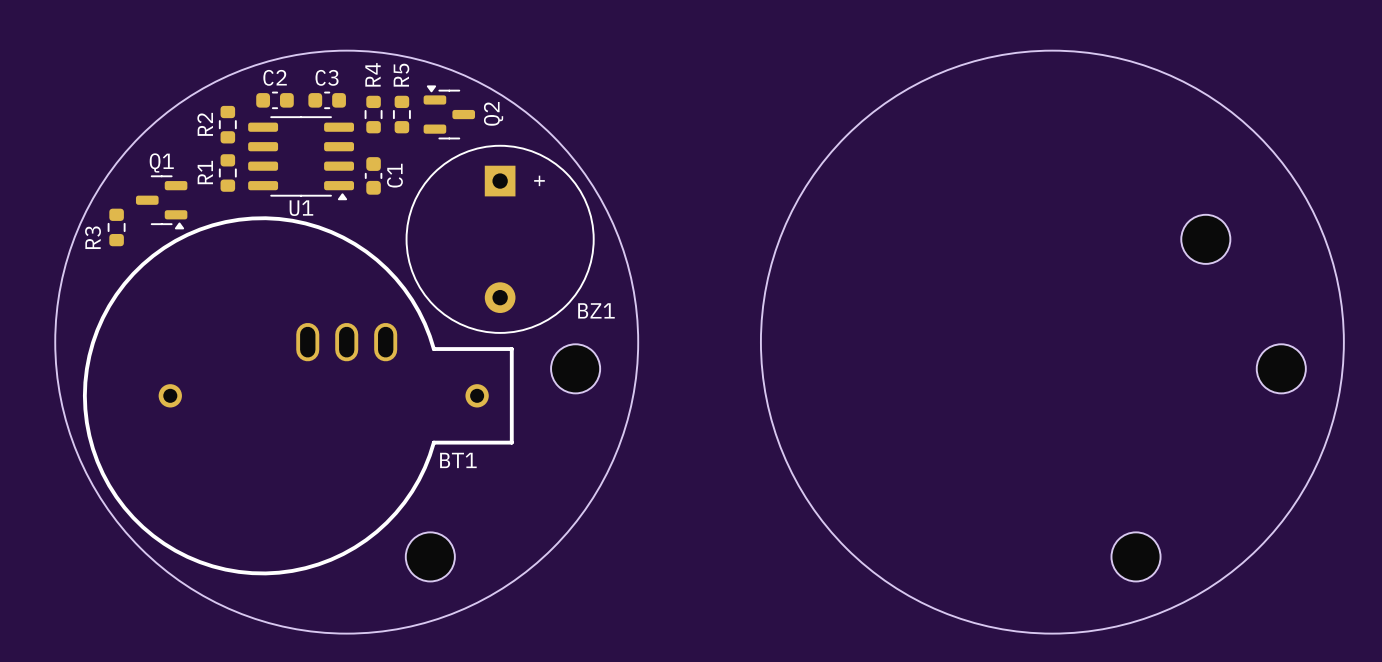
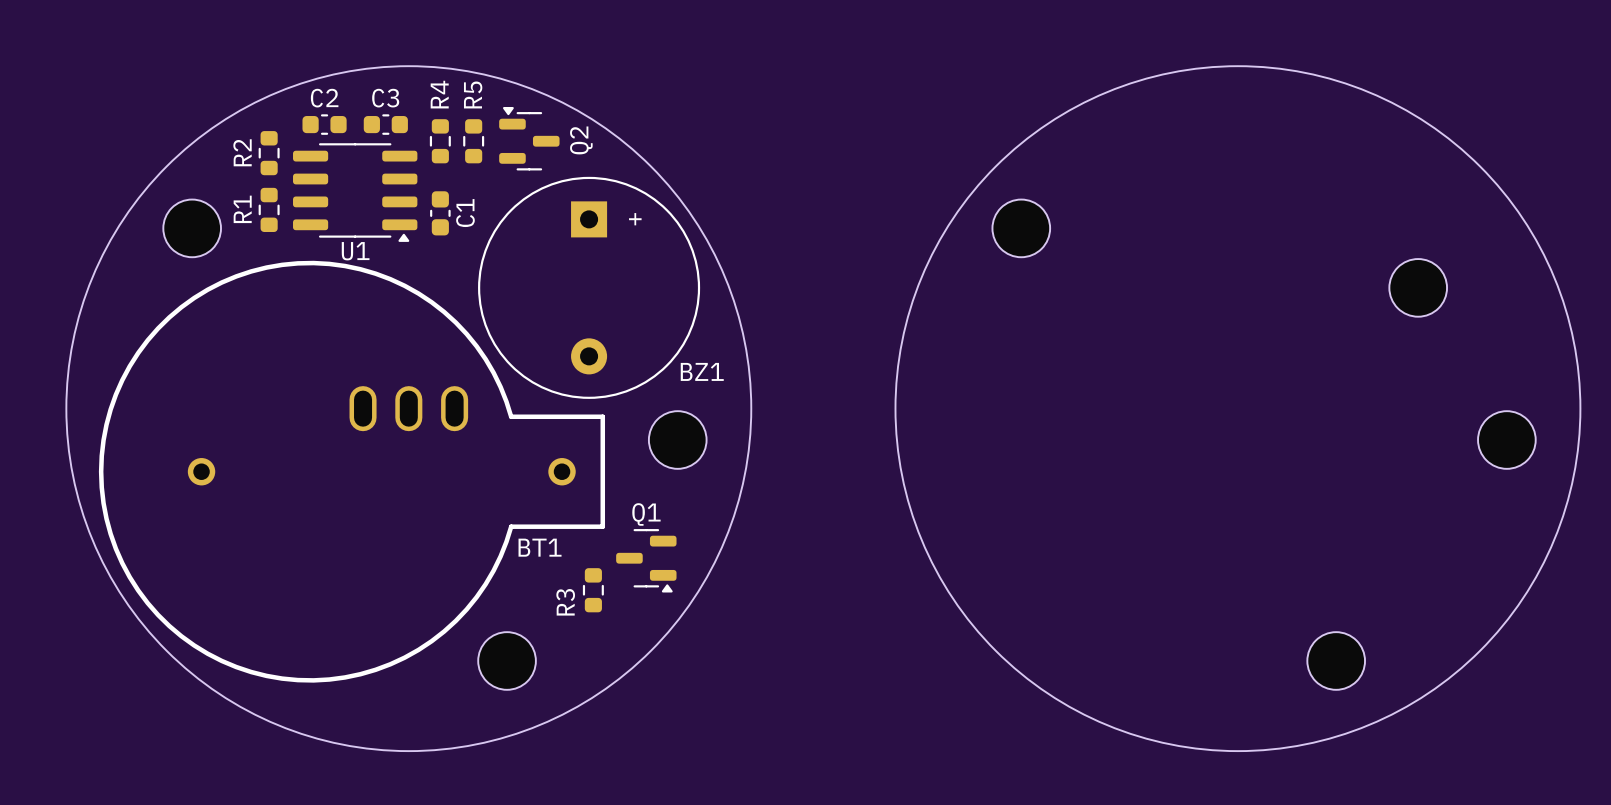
part: none -> (192, 228)
part: none -> (1021, 228)
Q1 position: (161, 202) -> (646, 560)
R3 position: (116, 227) -> (593, 590)

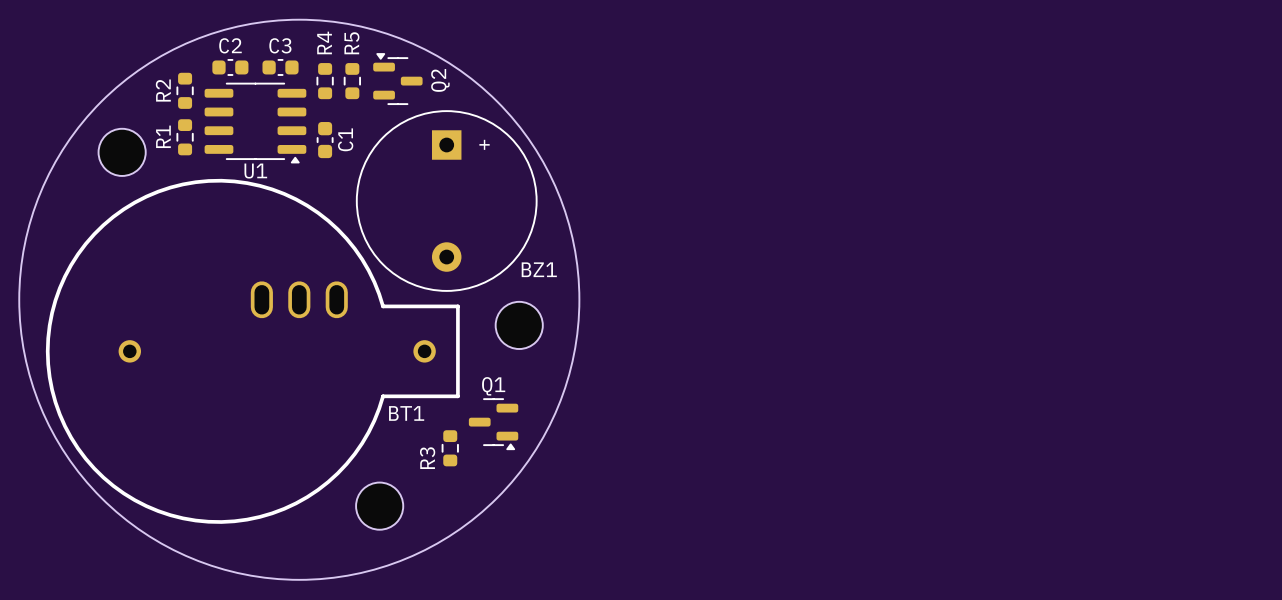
round board edge: [895, 65, 1581, 752] -> none
part: (1021, 228) -> none
part: (1418, 287) -> none
part: (1506, 440) -> none
part: (1336, 660) -> none

